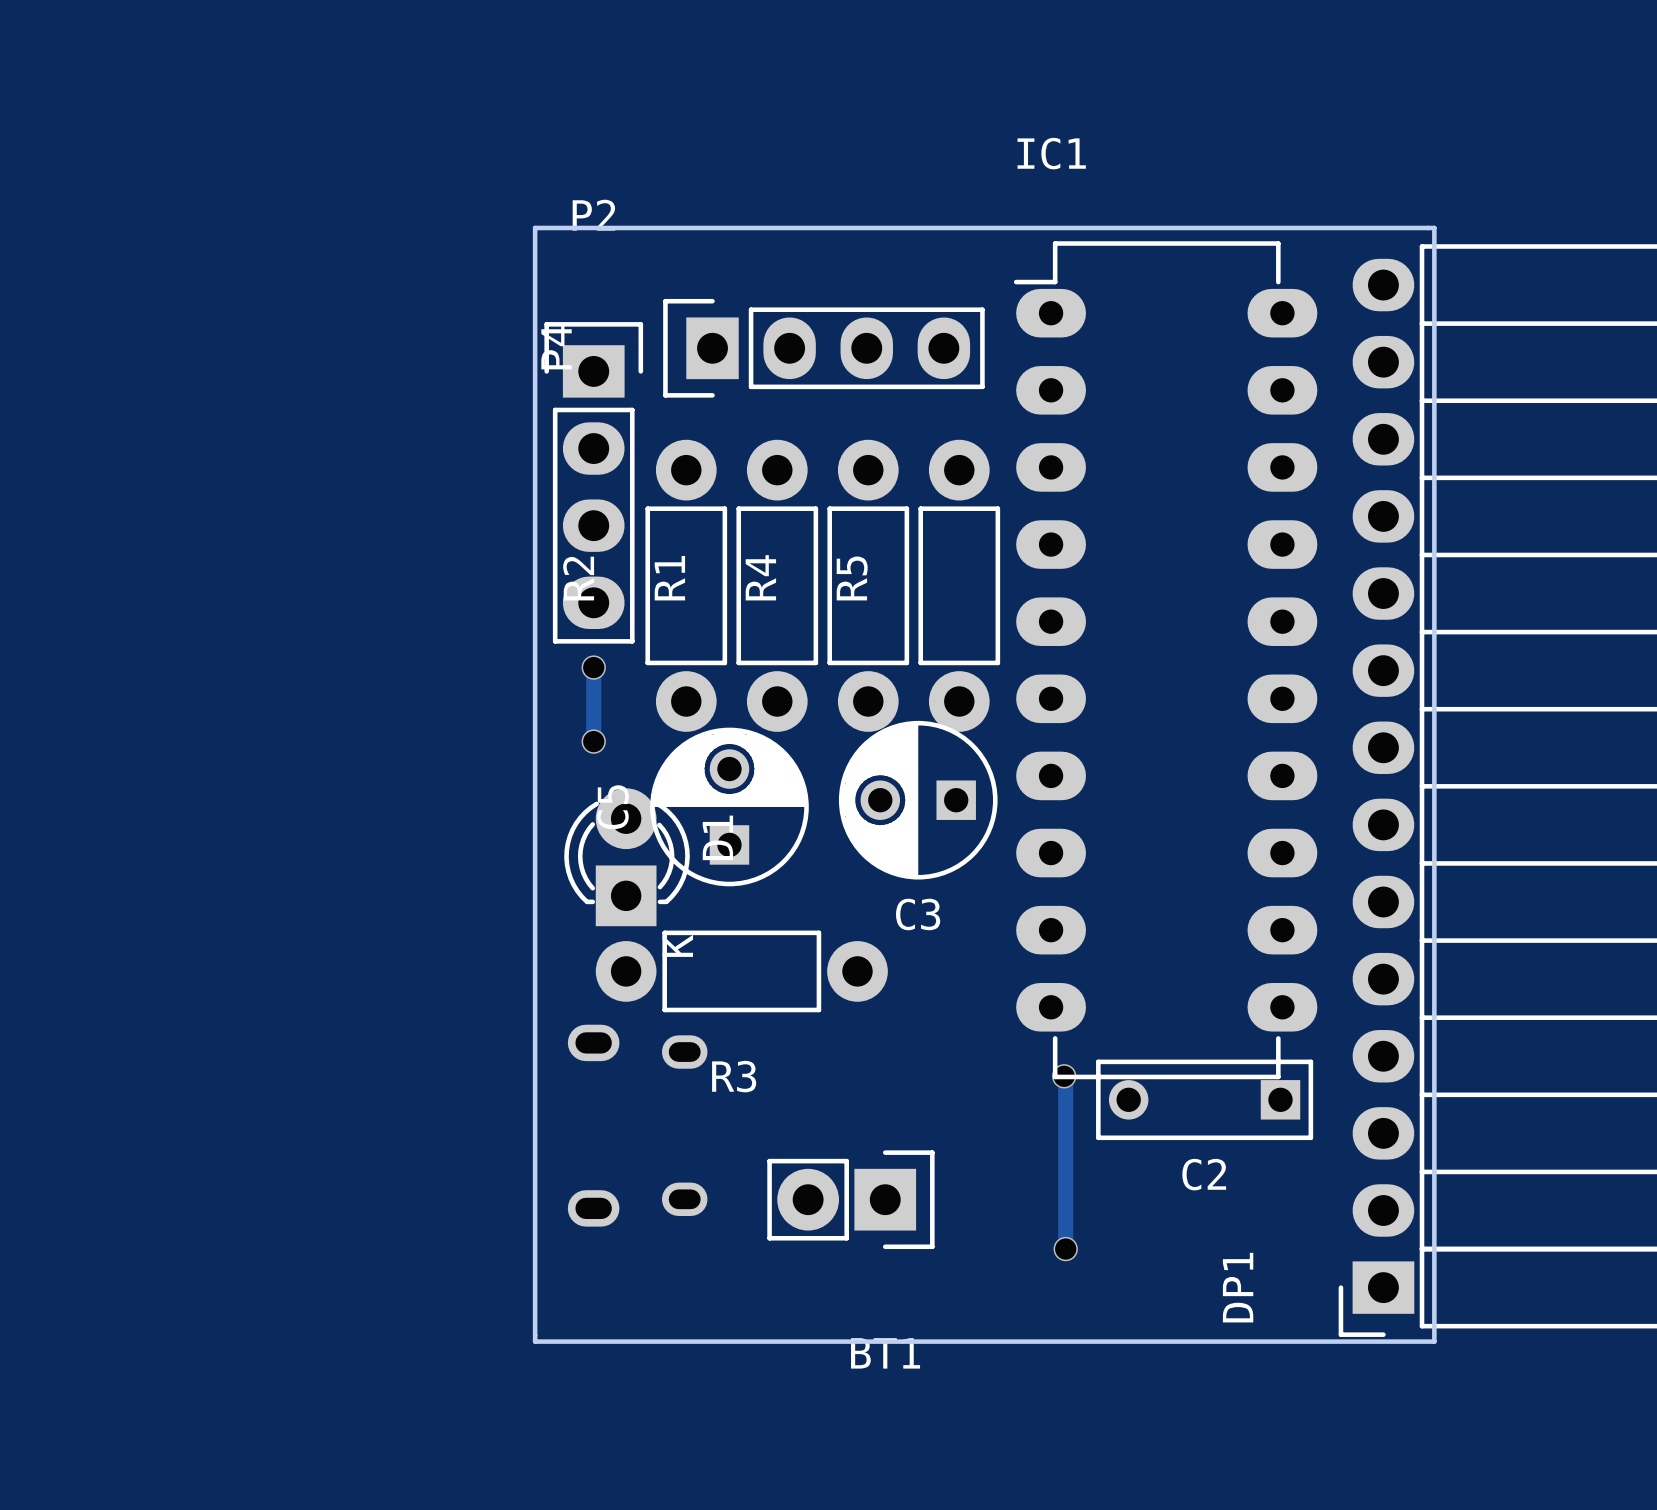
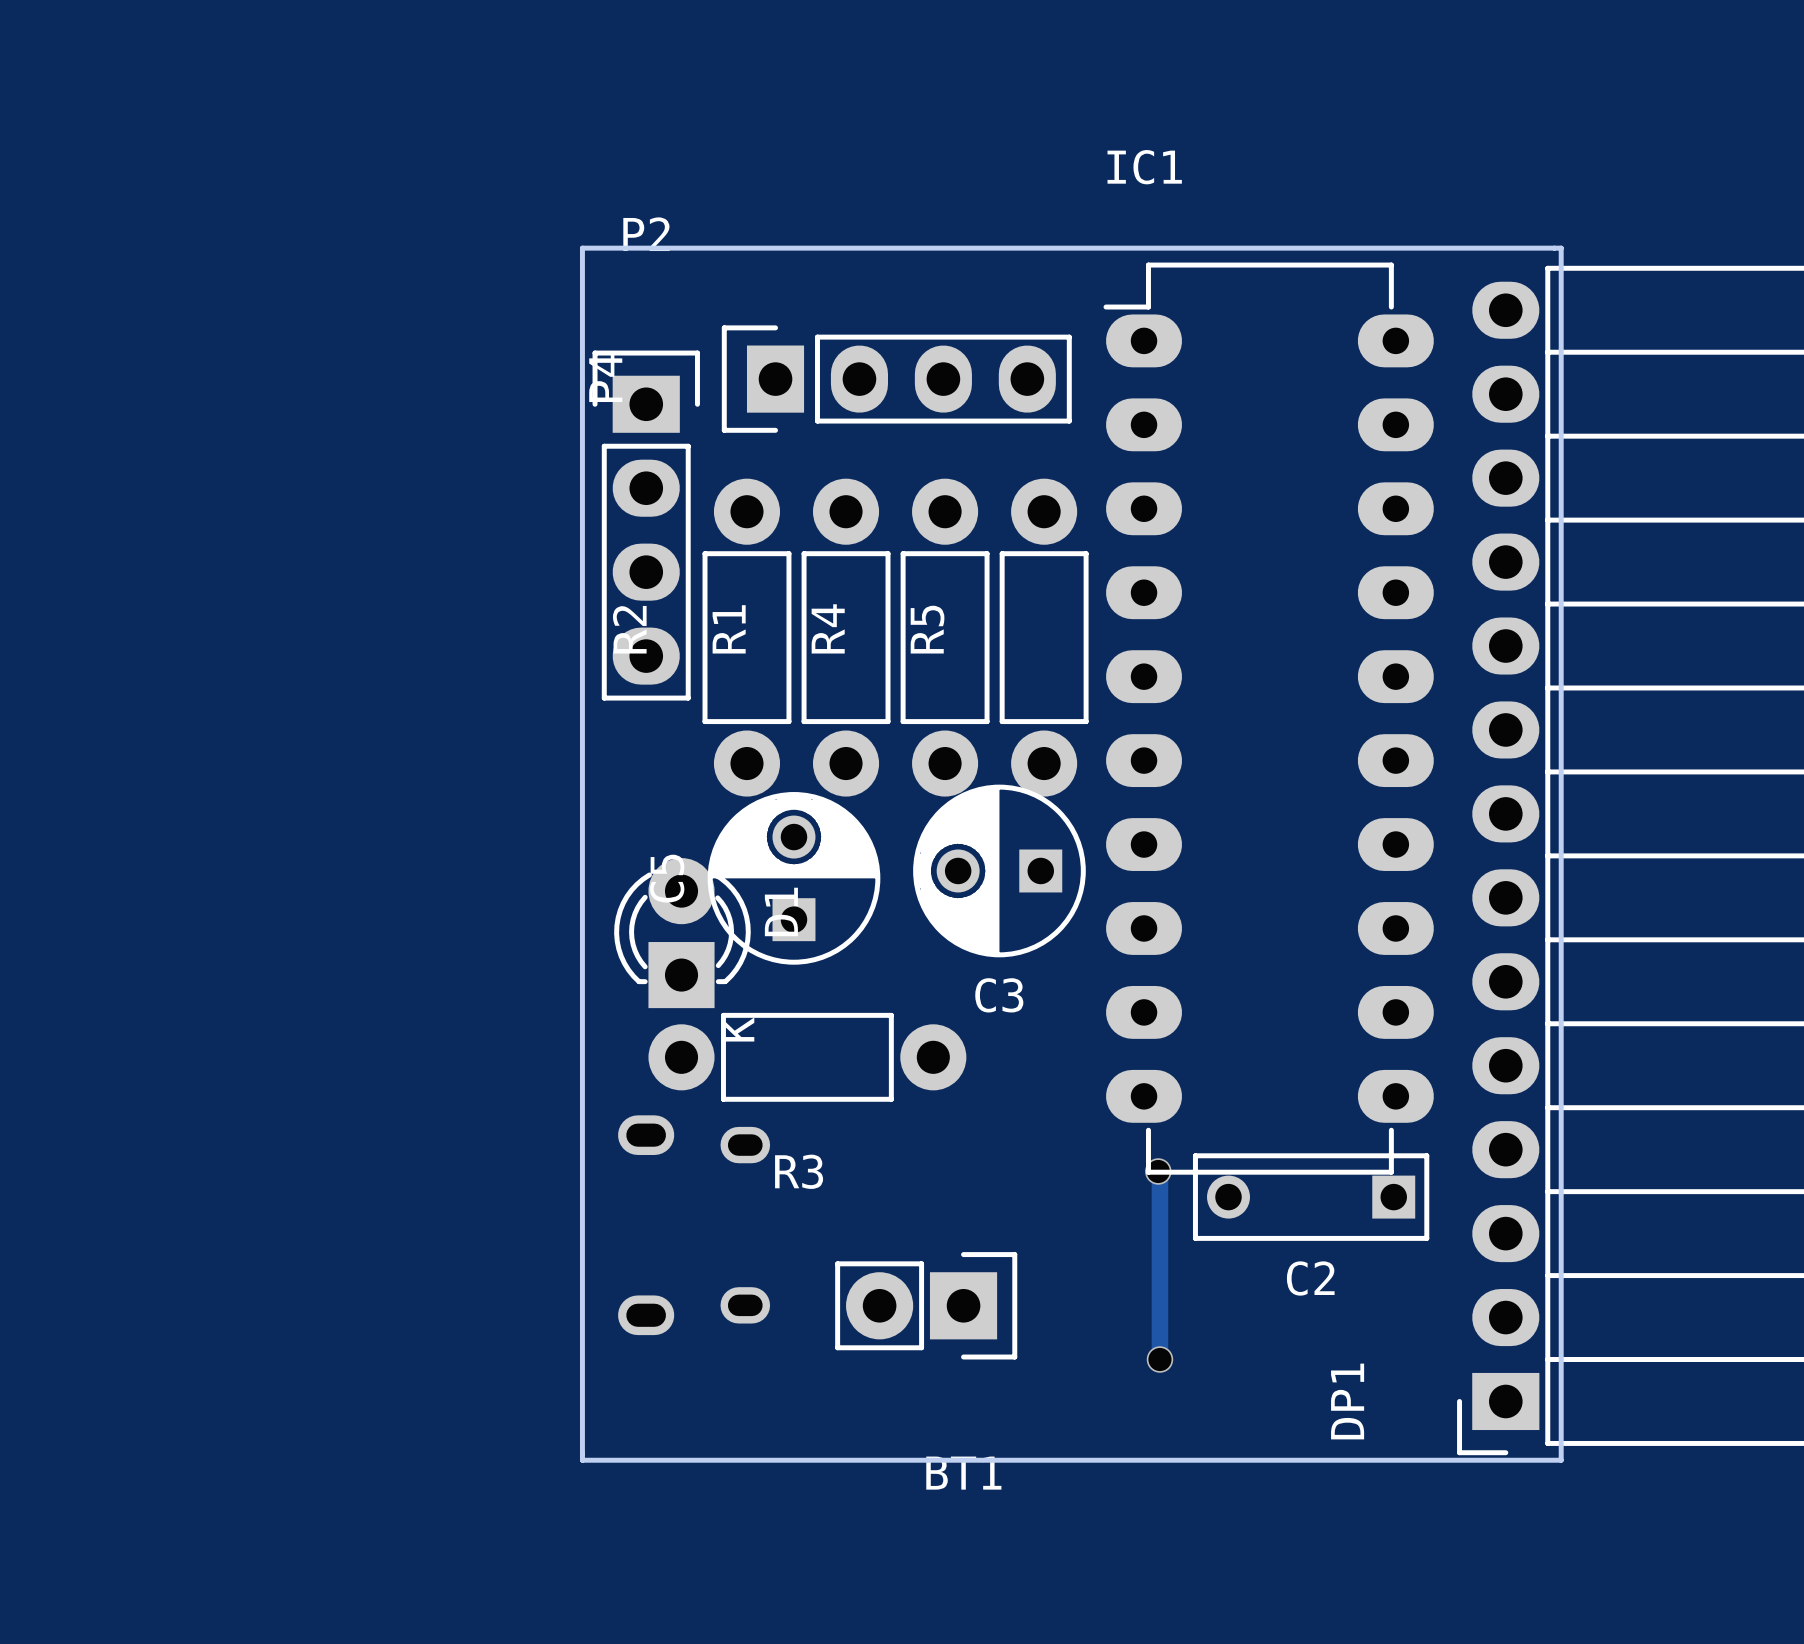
track: (593, 667) (593, 741) -> none
via: (593, 667) -> none
via: (593, 741) -> none

